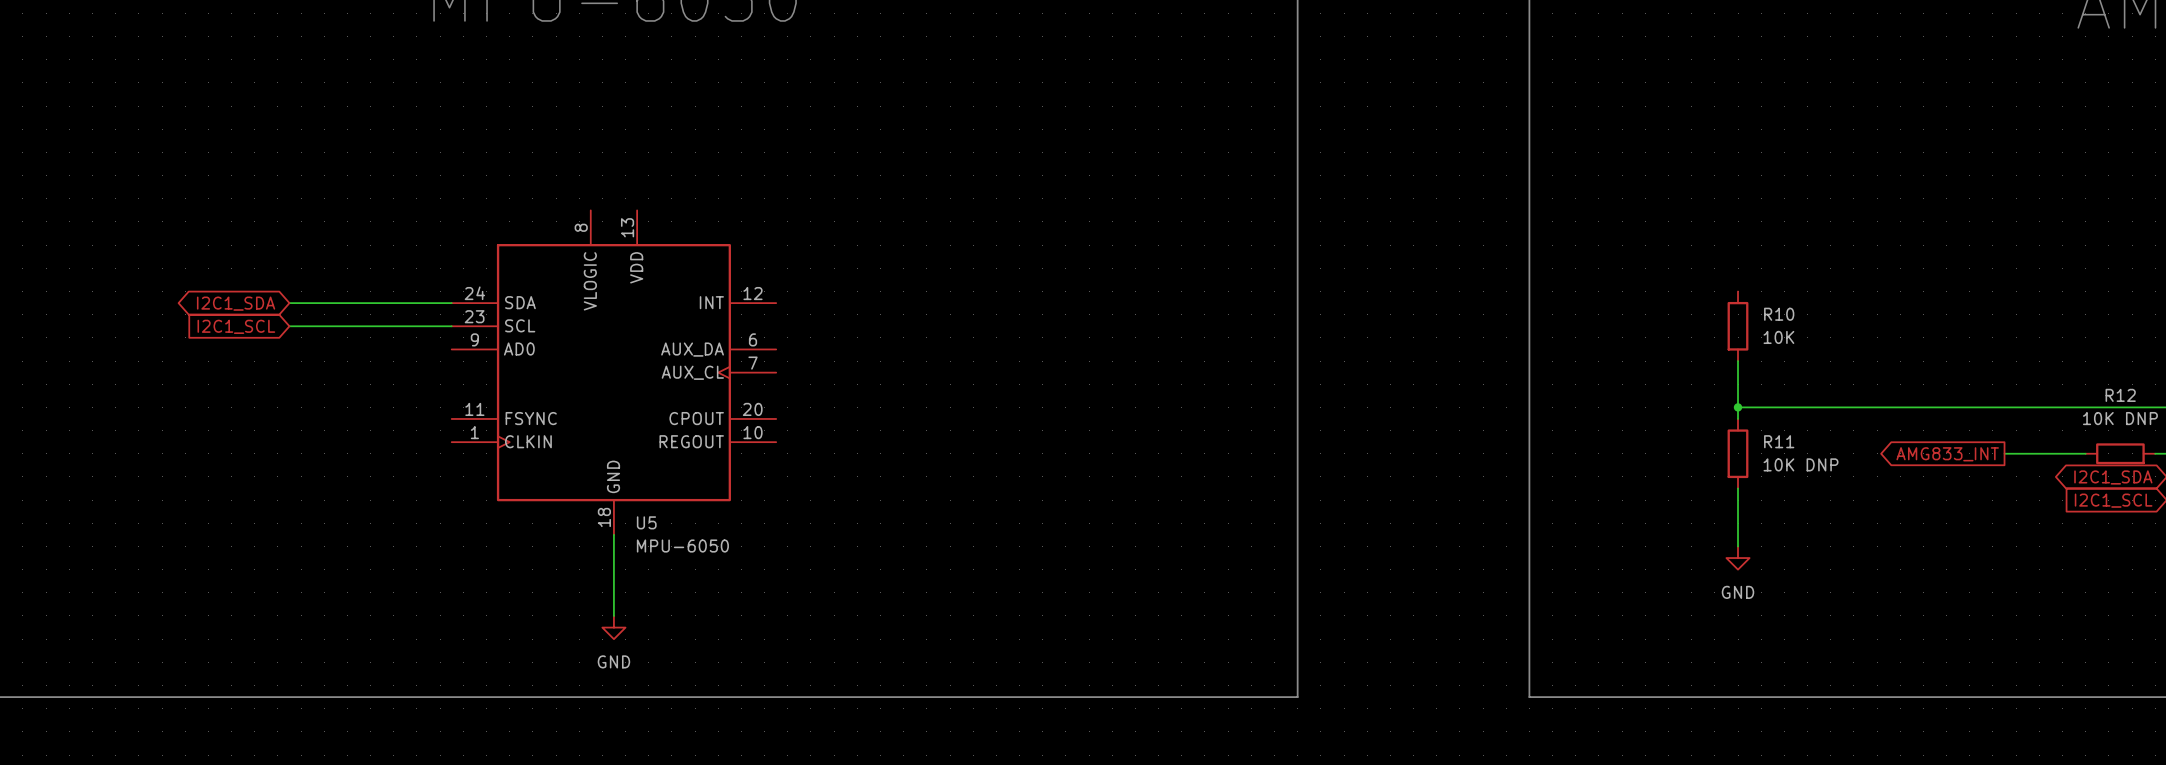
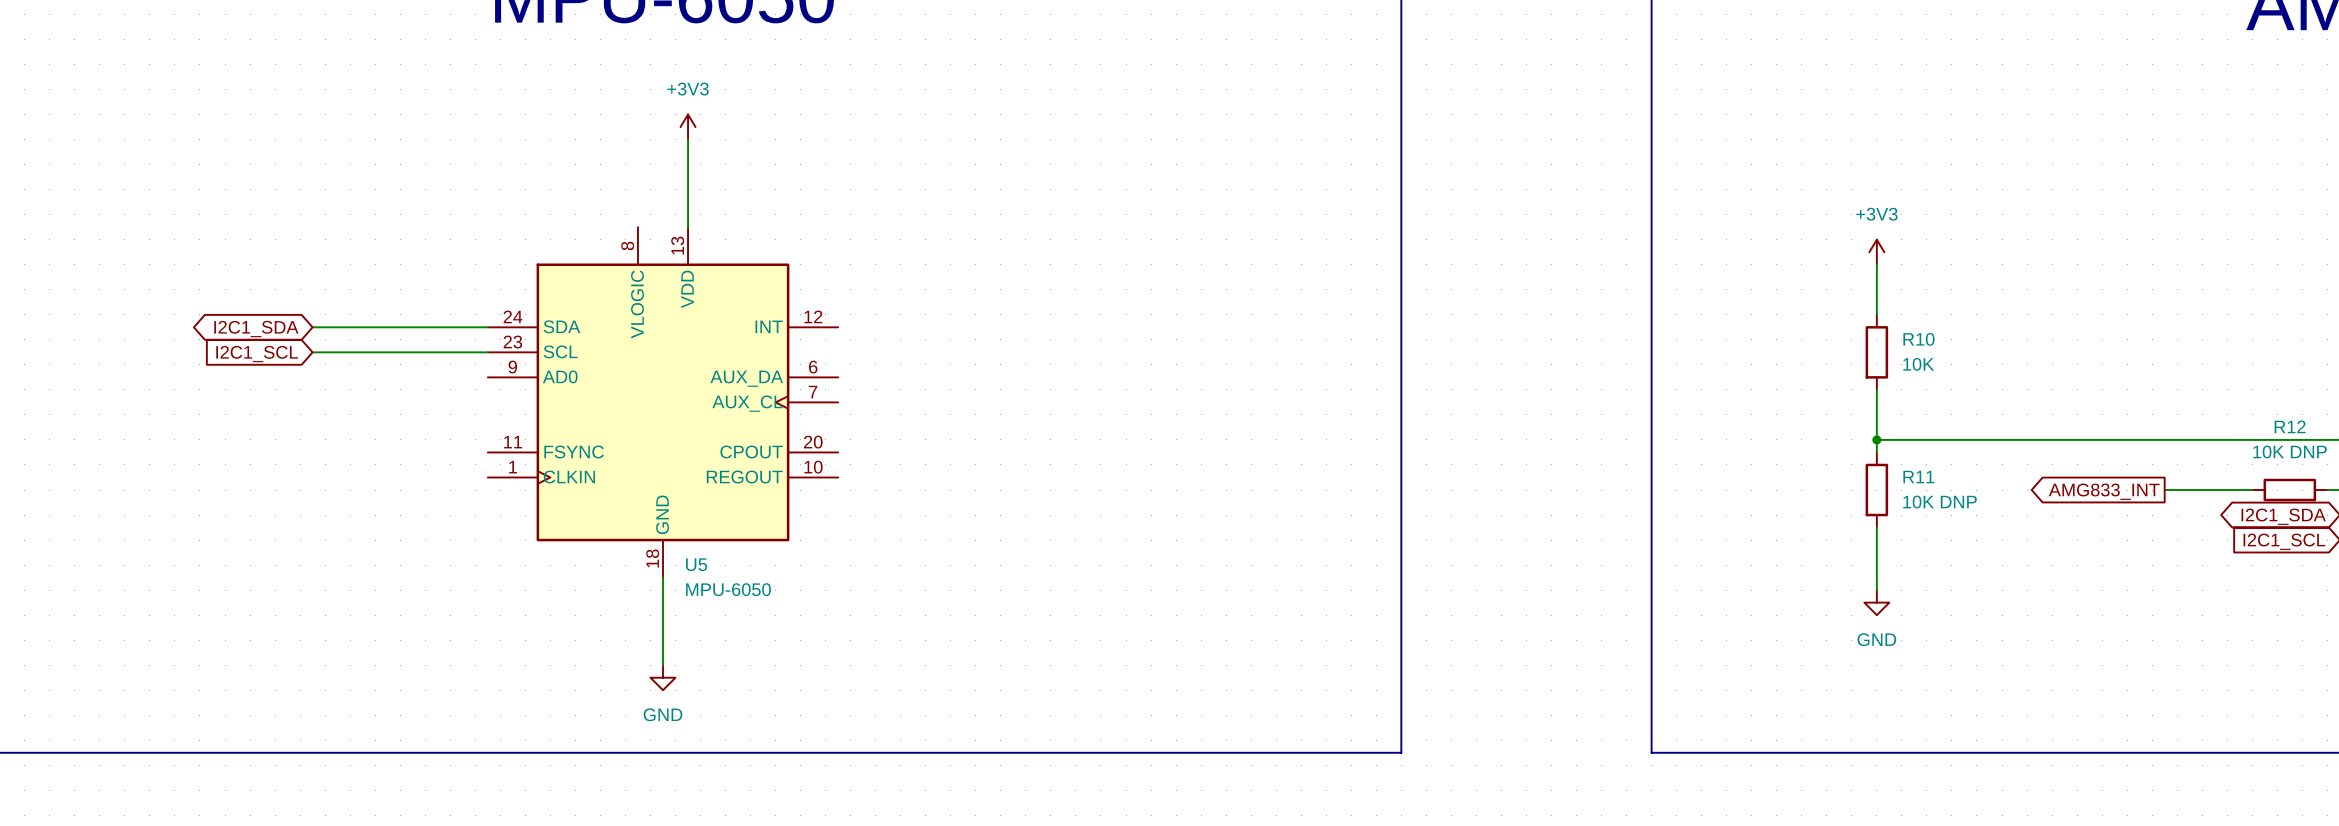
power symbol: none -> +3V3 (688, 127)
wire: none -> (688, 139) (688, 227)
power symbol: none -> +3V3 (1876, 252)
wire: none -> (1876, 264) (1876, 314)

